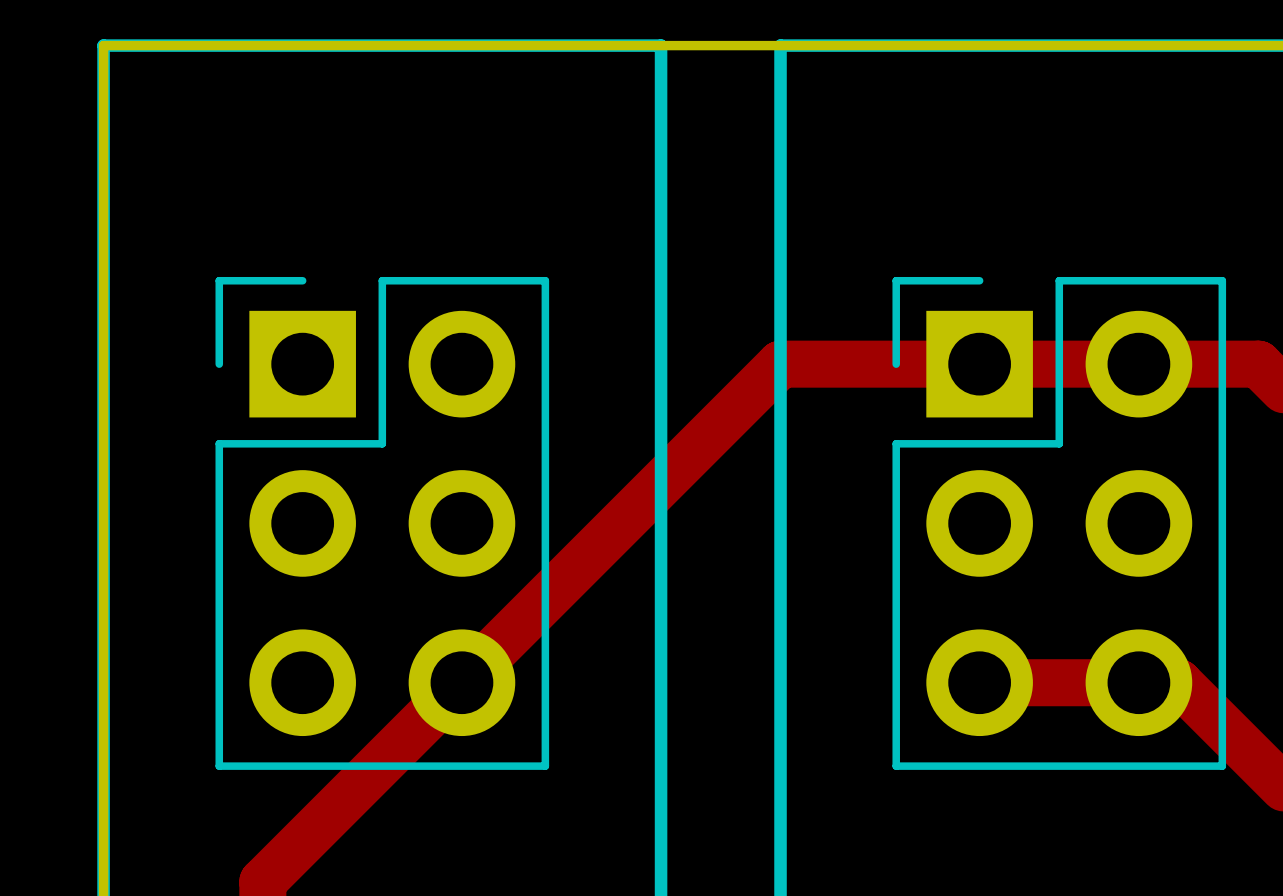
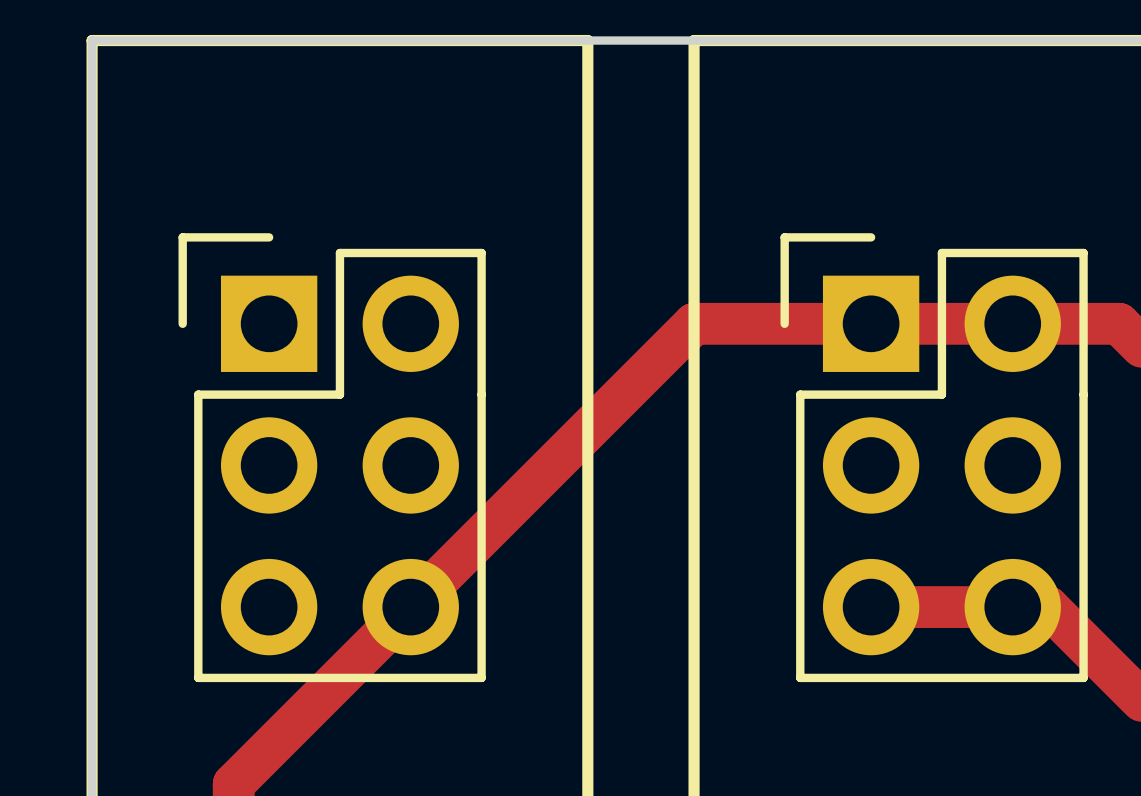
part footprint: [215, 276, 550, 770] -> [178, 233, 486, 683]
part footprint: [892, 276, 1227, 770] -> [780, 233, 1088, 683]

